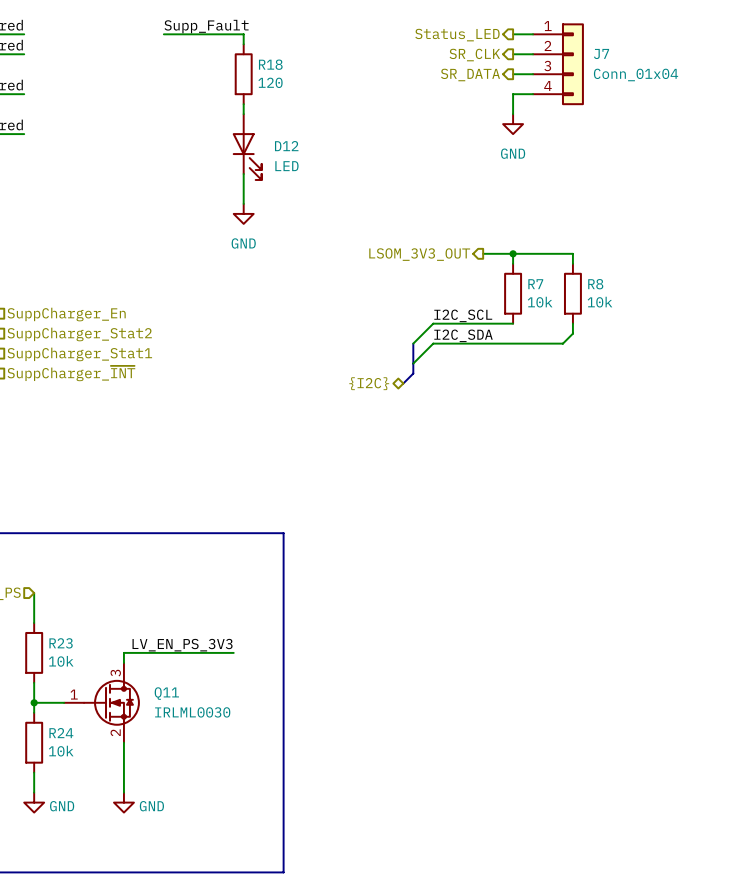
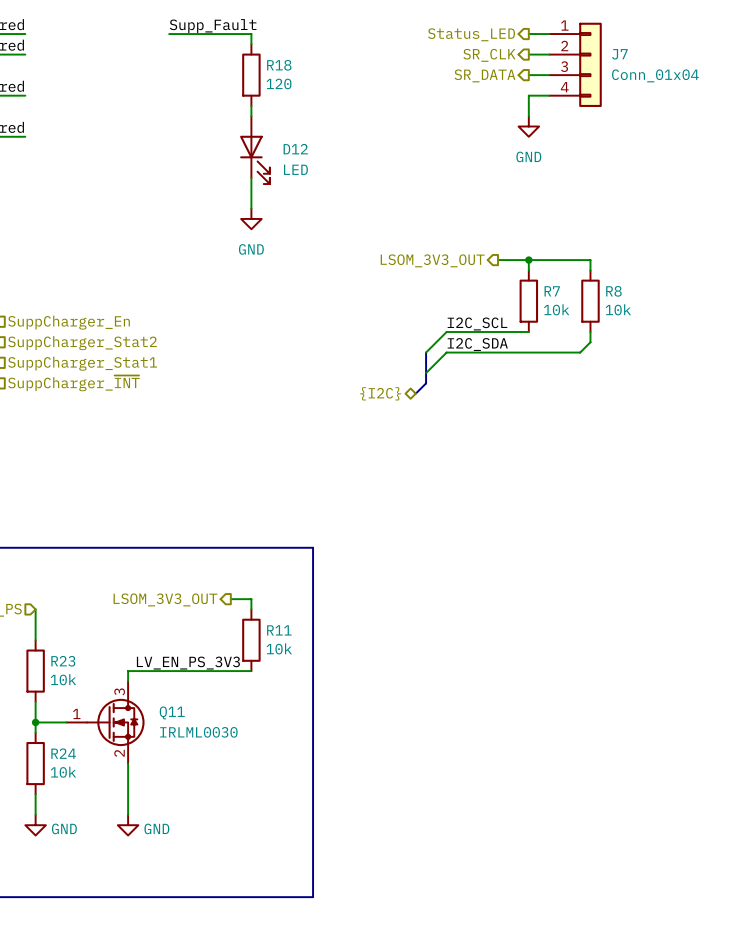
line: (283, 533) (283, 872) -> (292, 547) (313, 547) (313, 897) (292, 897)
hierarchical label: none -> LSOM_3V3_OUT (165, 599)
wire: none -> (230, 599) (251, 599) (251, 609)
R11: none -> 10k (251, 640)
wire: none -> (241, 671) (251, 671)

